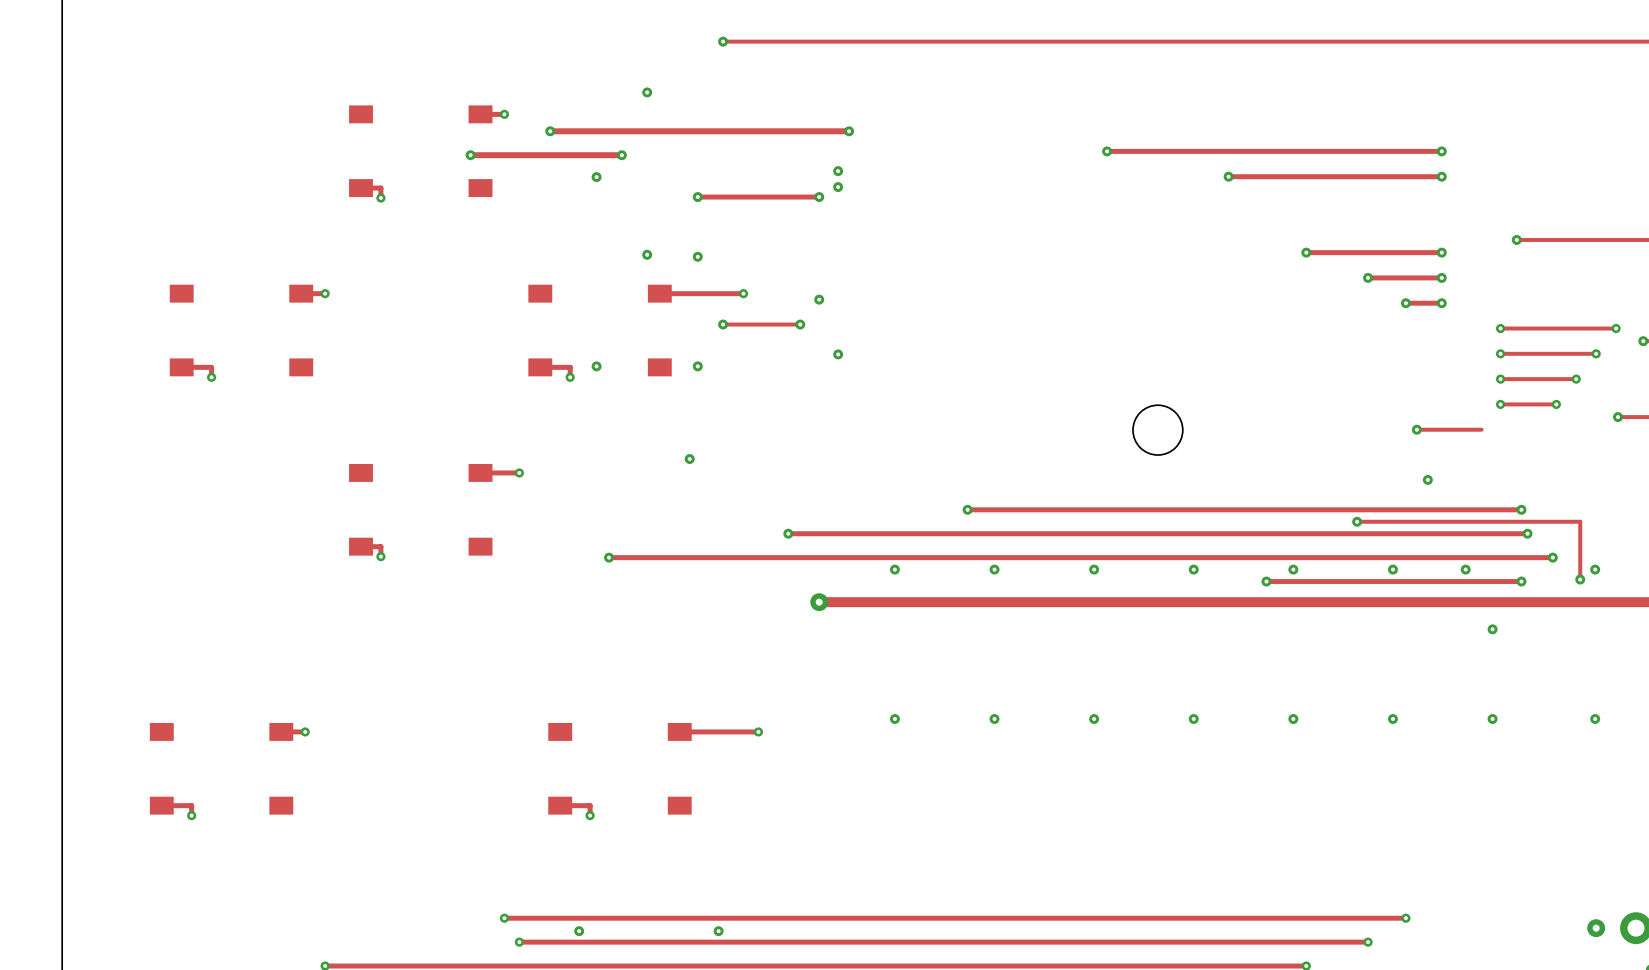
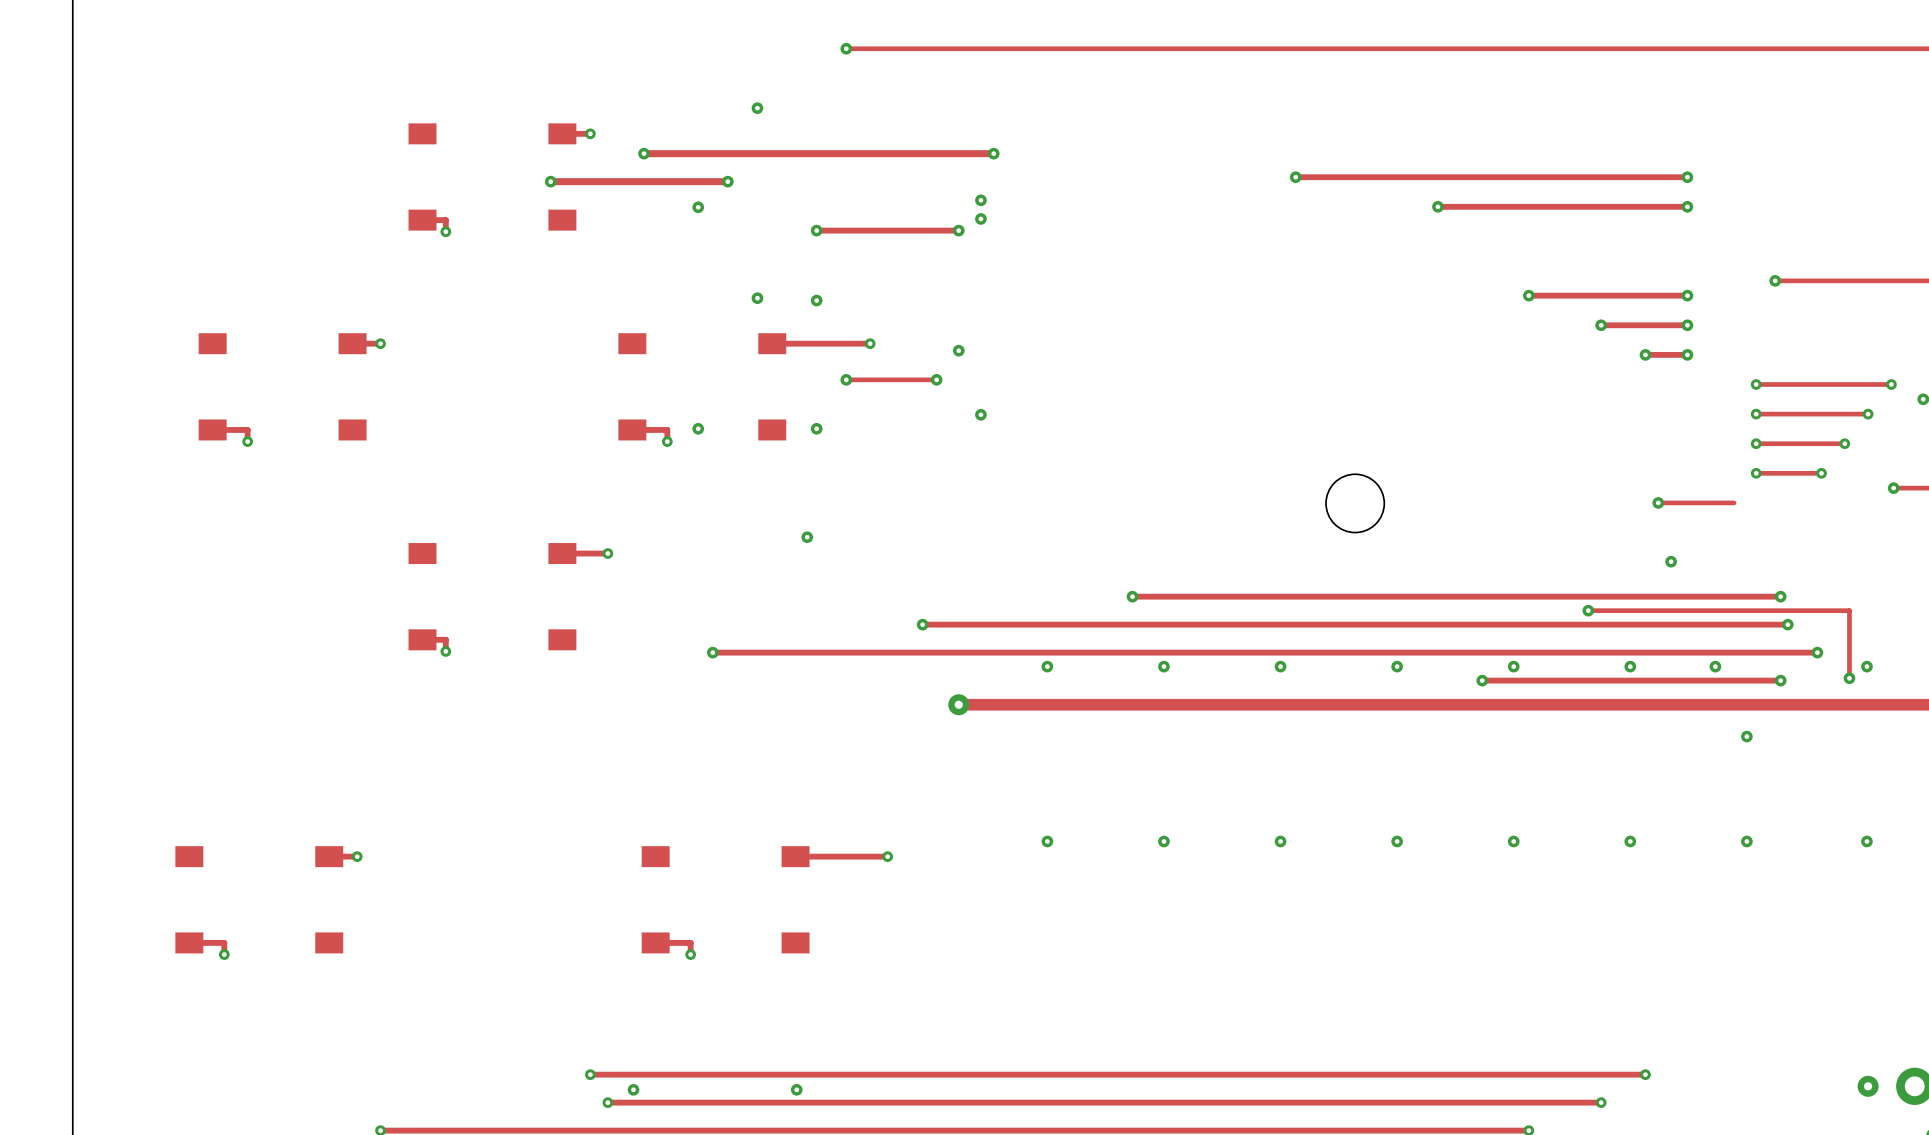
via position: (579, 931) -> (633, 1089)
via position: (718, 931) -> (796, 1089)

